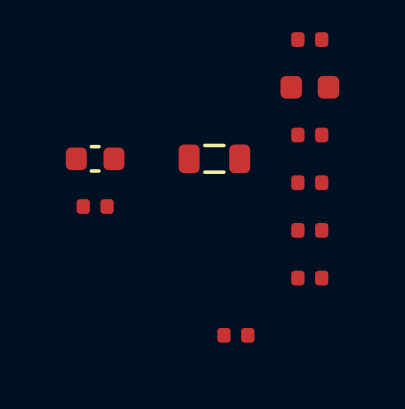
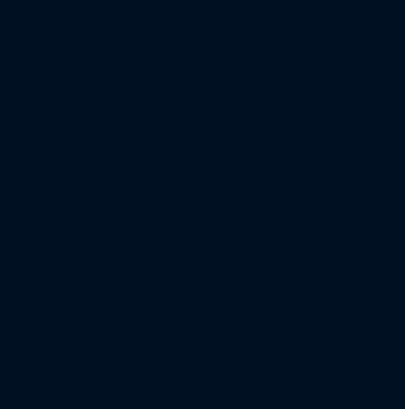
part: (309, 39) -> none
part: (309, 87) -> none
part: (309, 134) -> none
part: (95, 158) -> none
part: (214, 158) -> none
part: (309, 182) -> none
part: (95, 206) -> none
part: (309, 230) -> none
part: (309, 278) -> none
part: (235, 335) -> none

